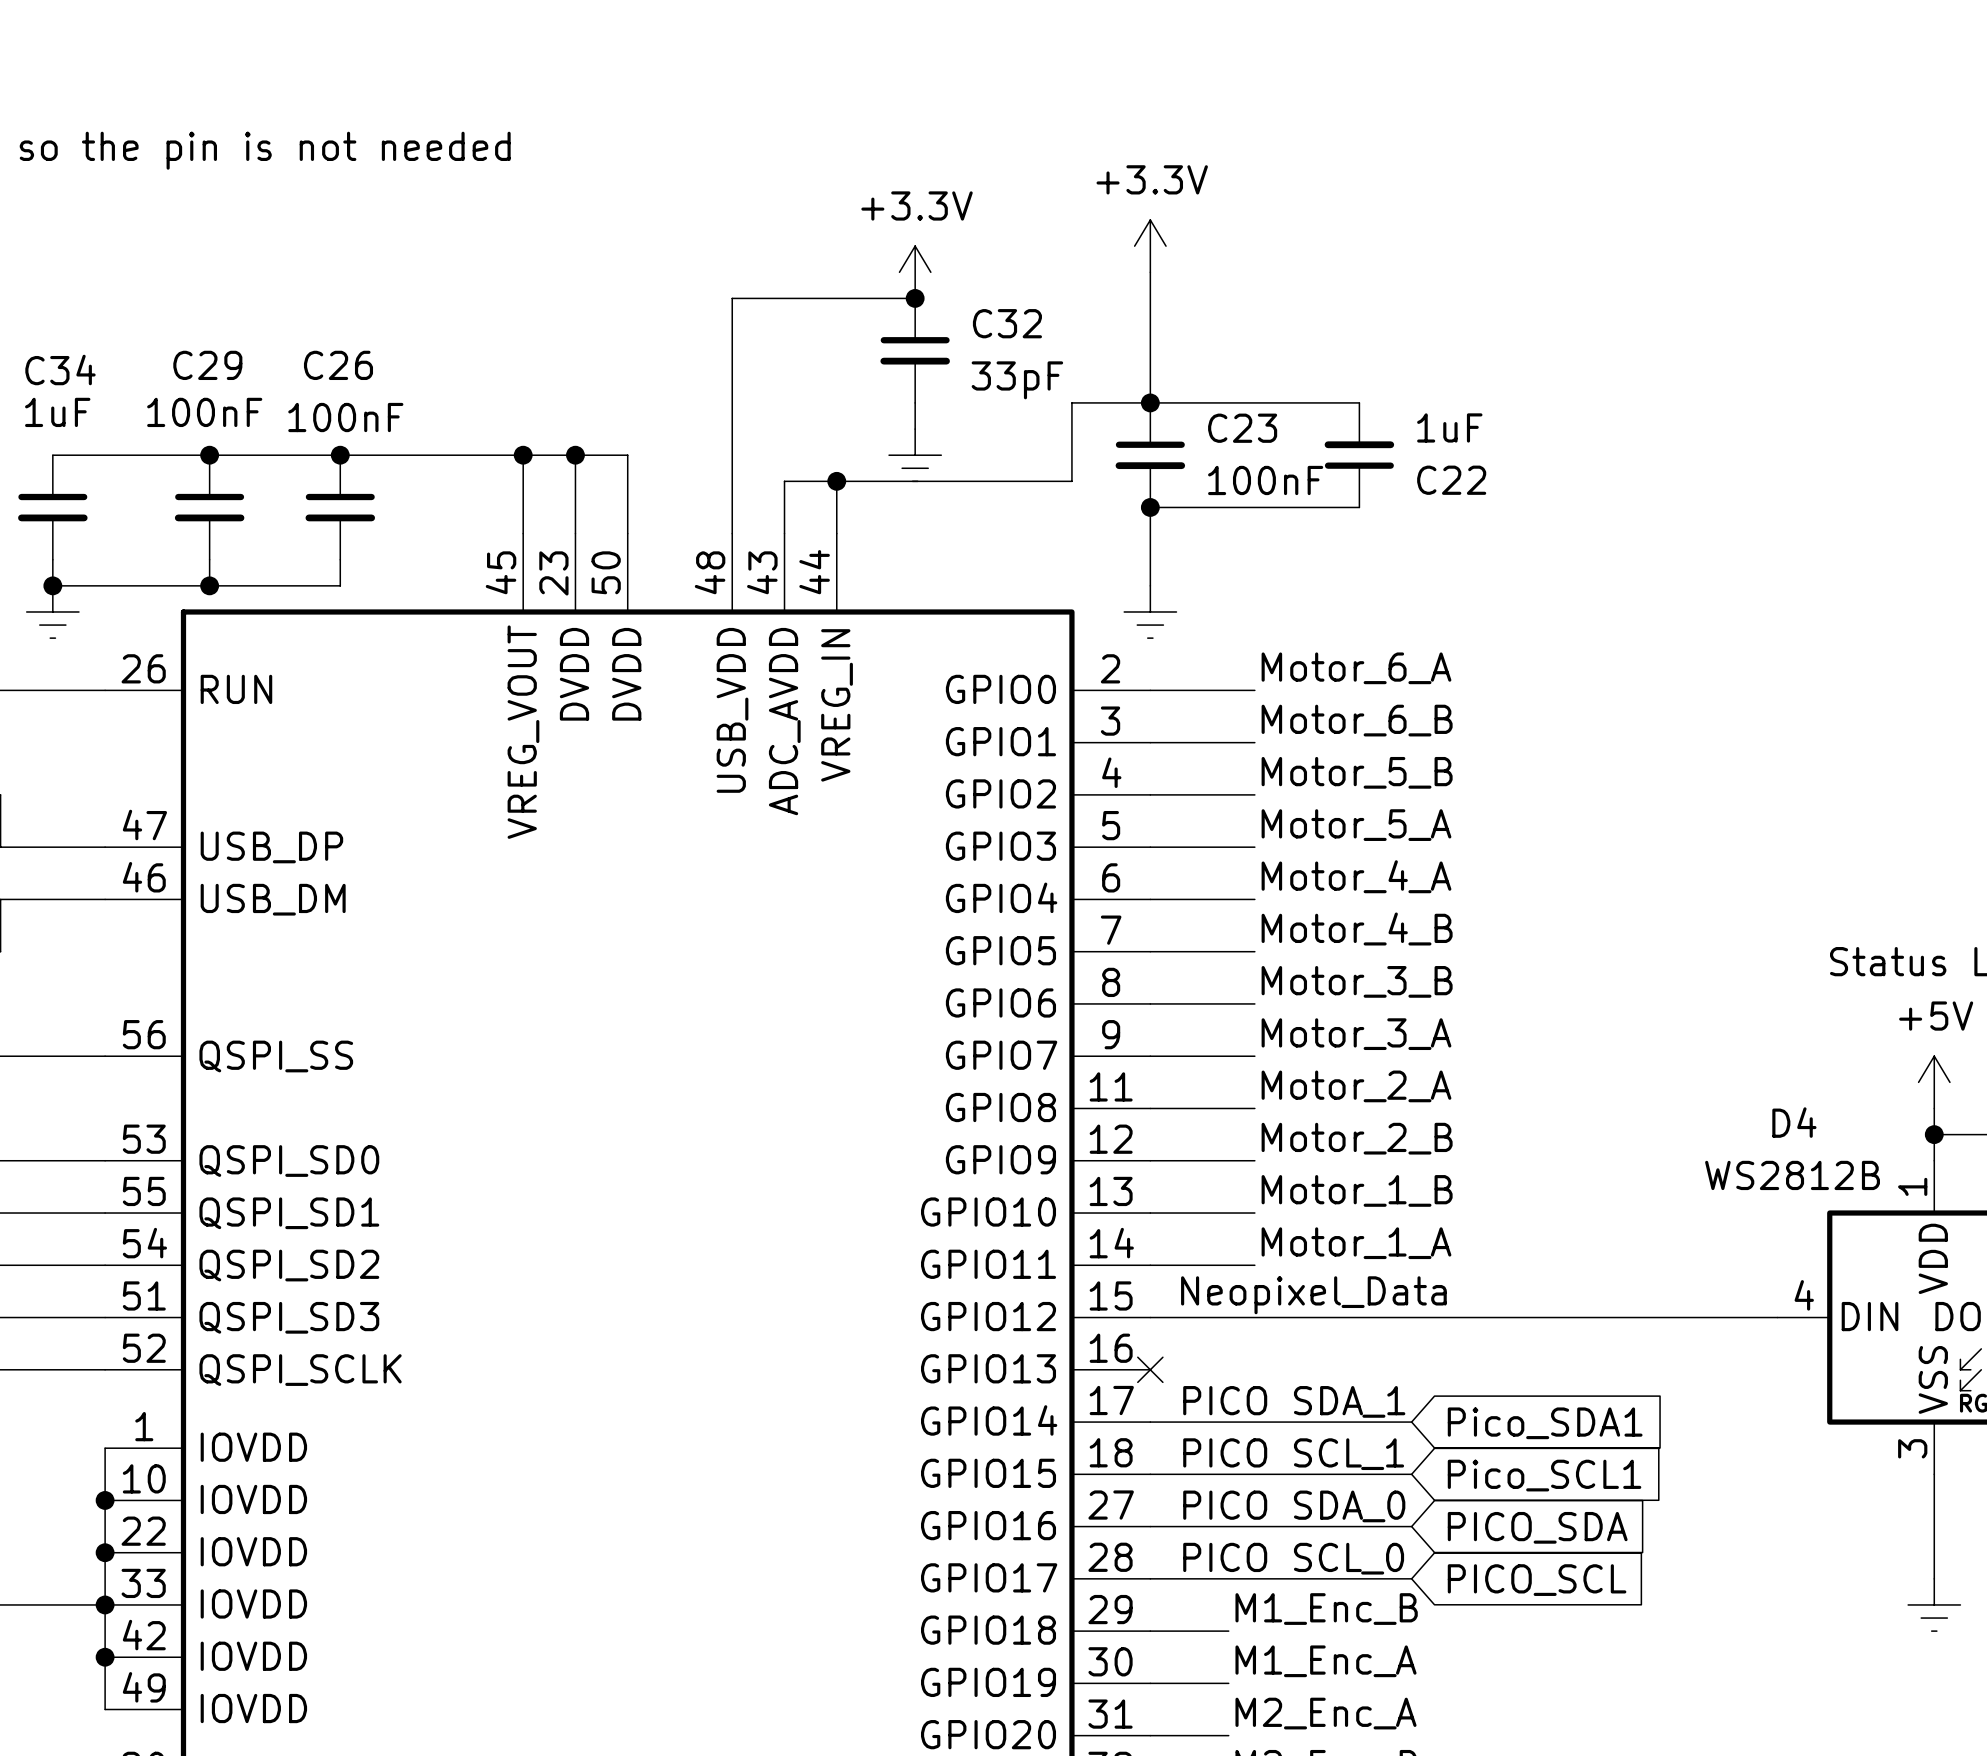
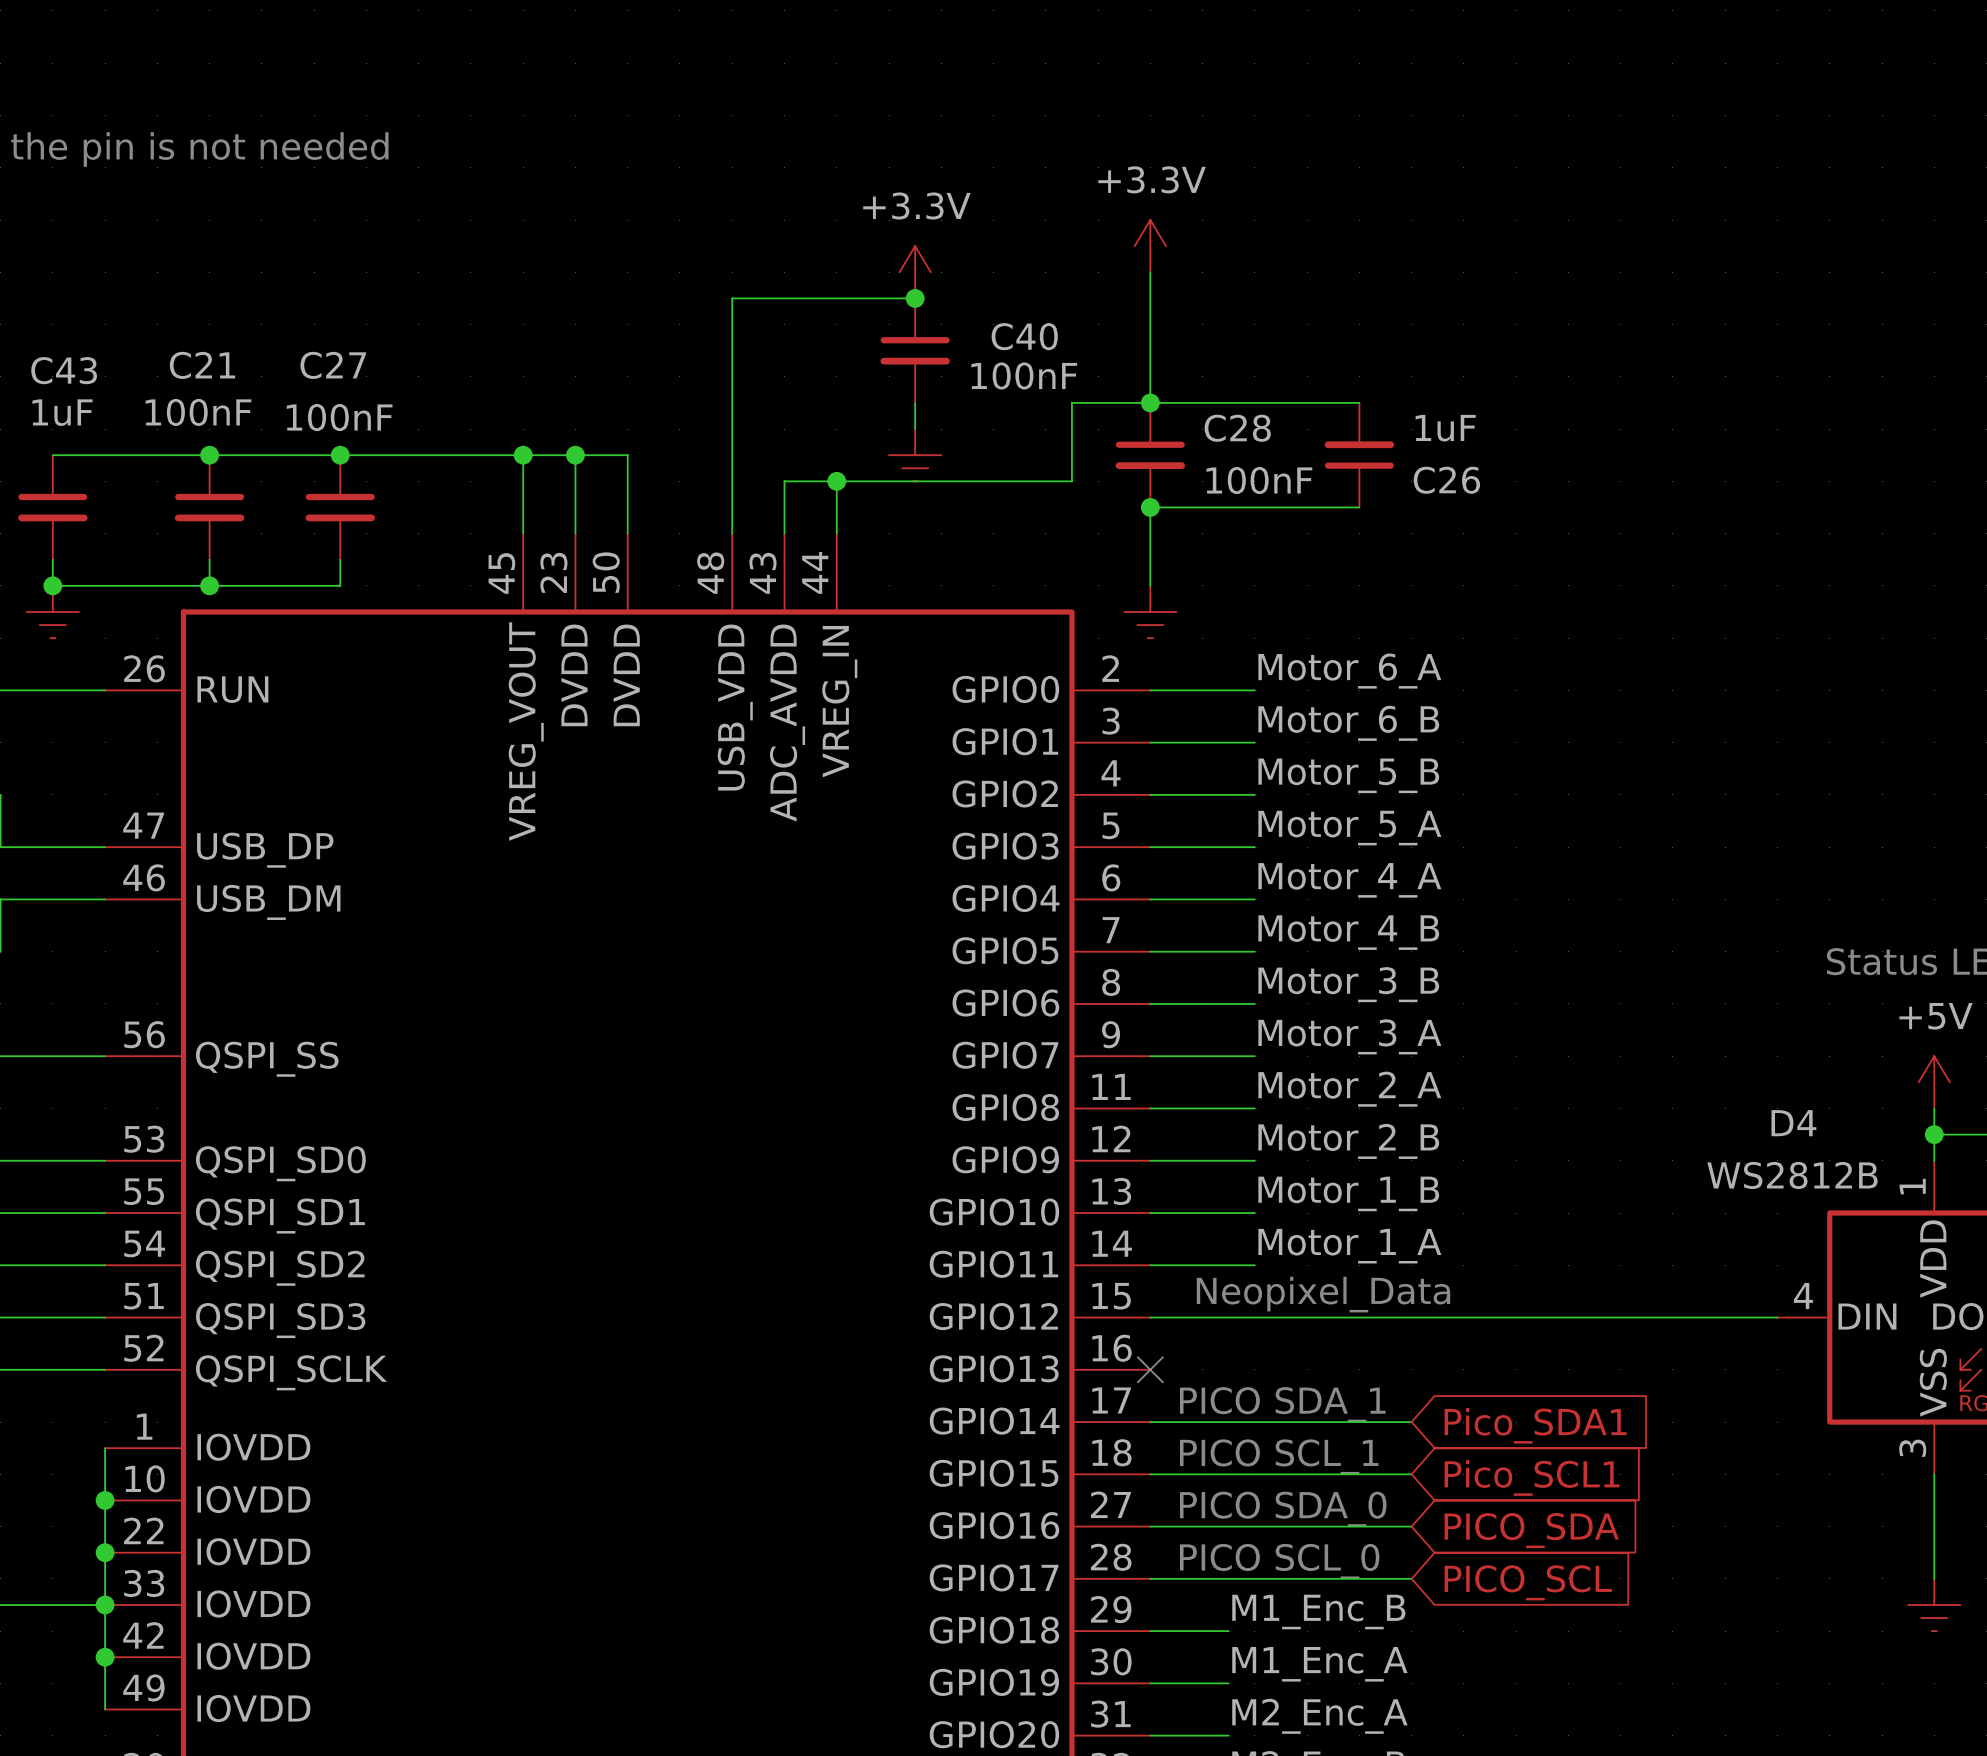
C32 name: C32 (1007, 323) -> none
C32 text: none -> C40 (1024, 336)
C29 name: C29 (207, 365) -> C21 (202, 365)
C26 name: C26 (338, 365) -> C27 (333, 365)
C34 name: C34 (60, 369) -> C43 (64, 370)
C32 value: 33pF (1017, 380) -> 100nF (1024, 375)
C23 name: C23 (1242, 428) -> C28 (1237, 428)
C22 name: C22 (1451, 480) -> C26 (1446, 480)

